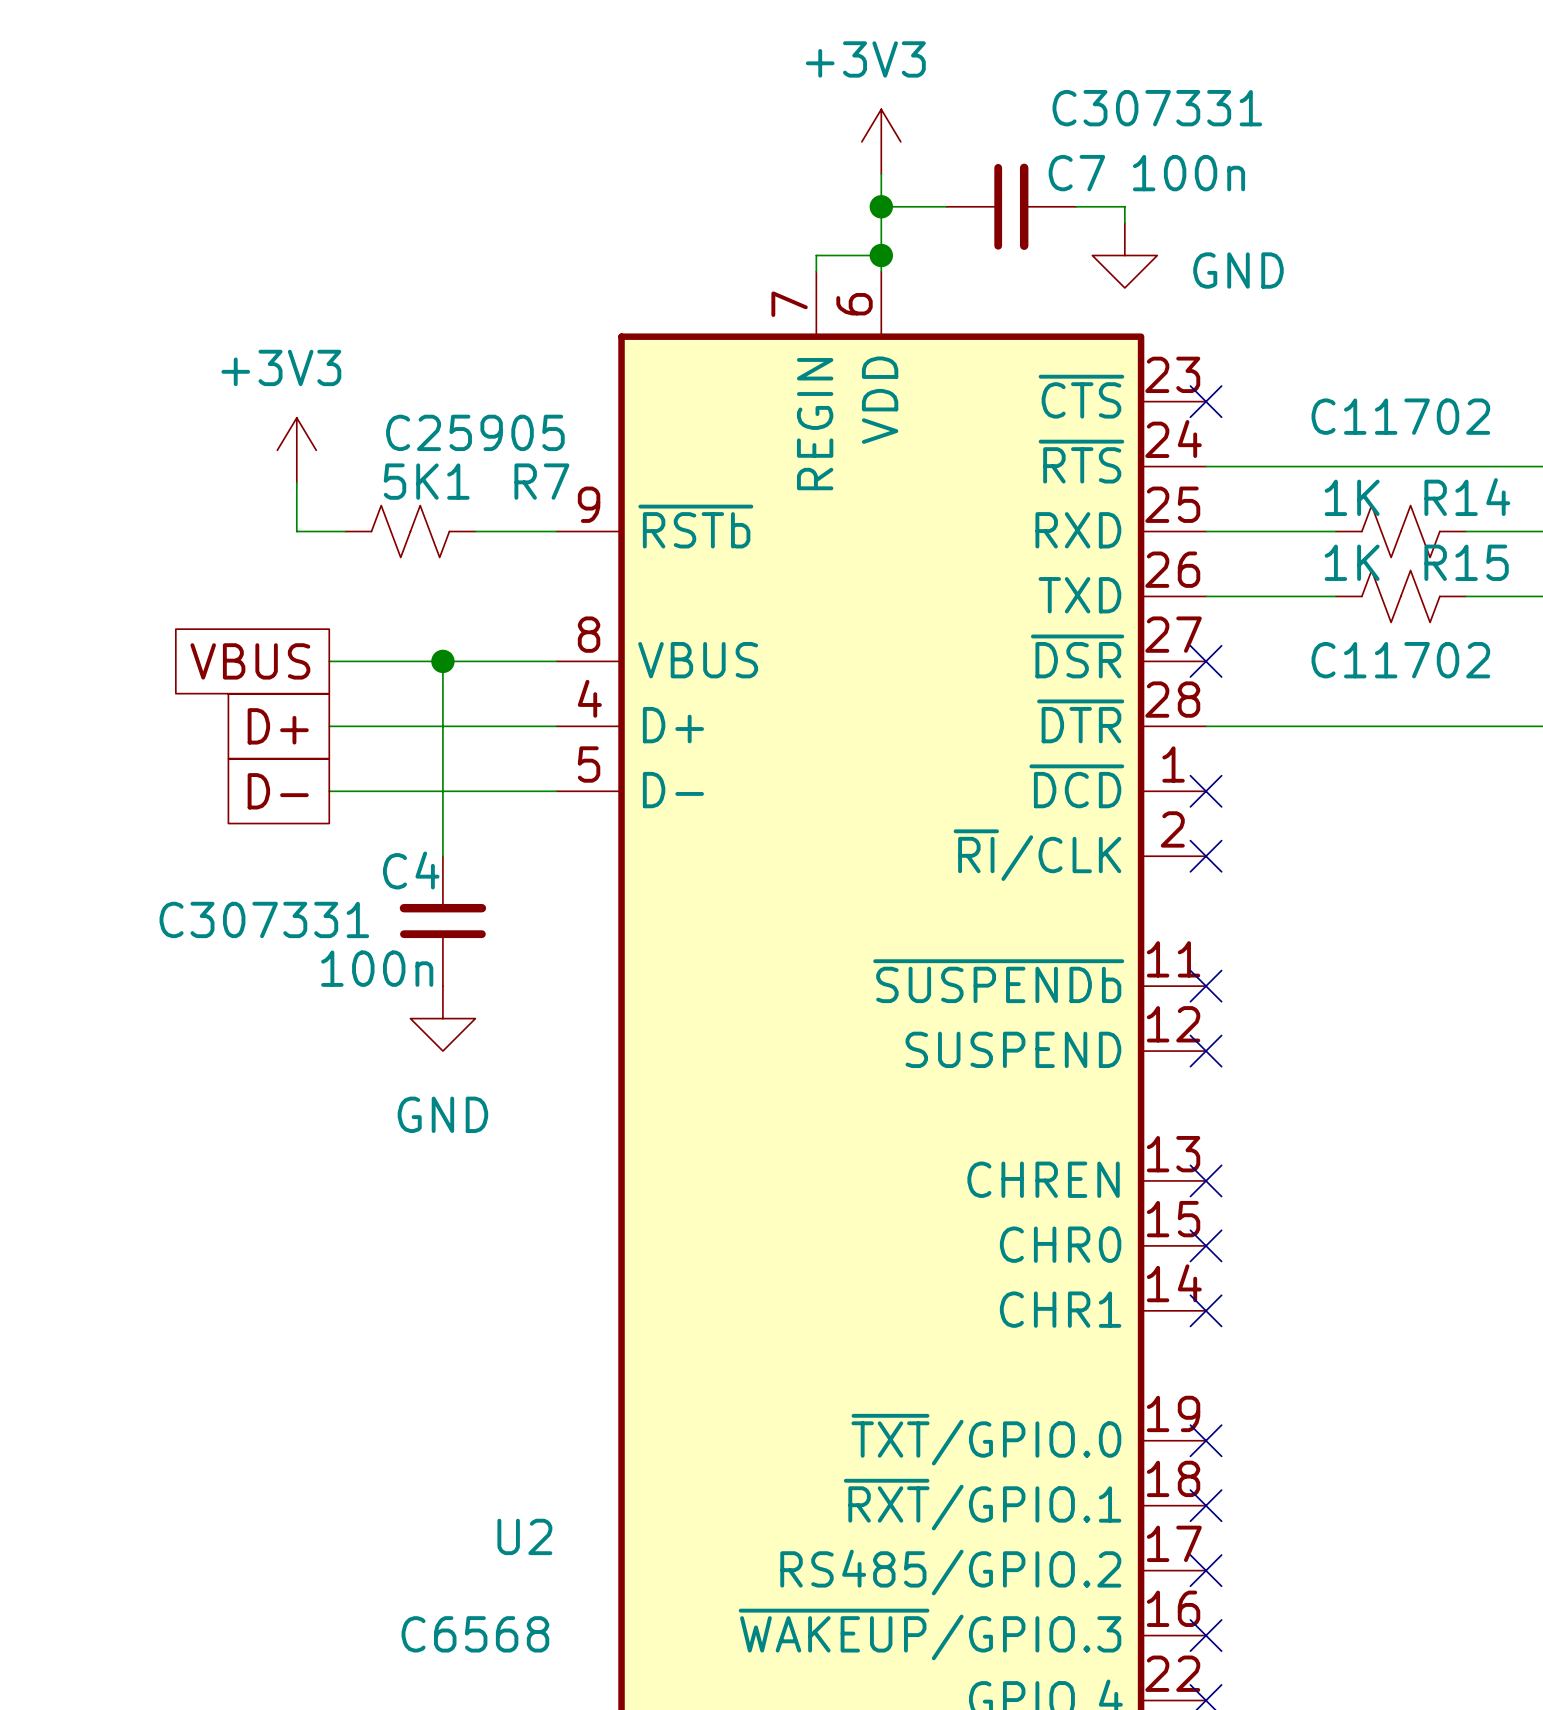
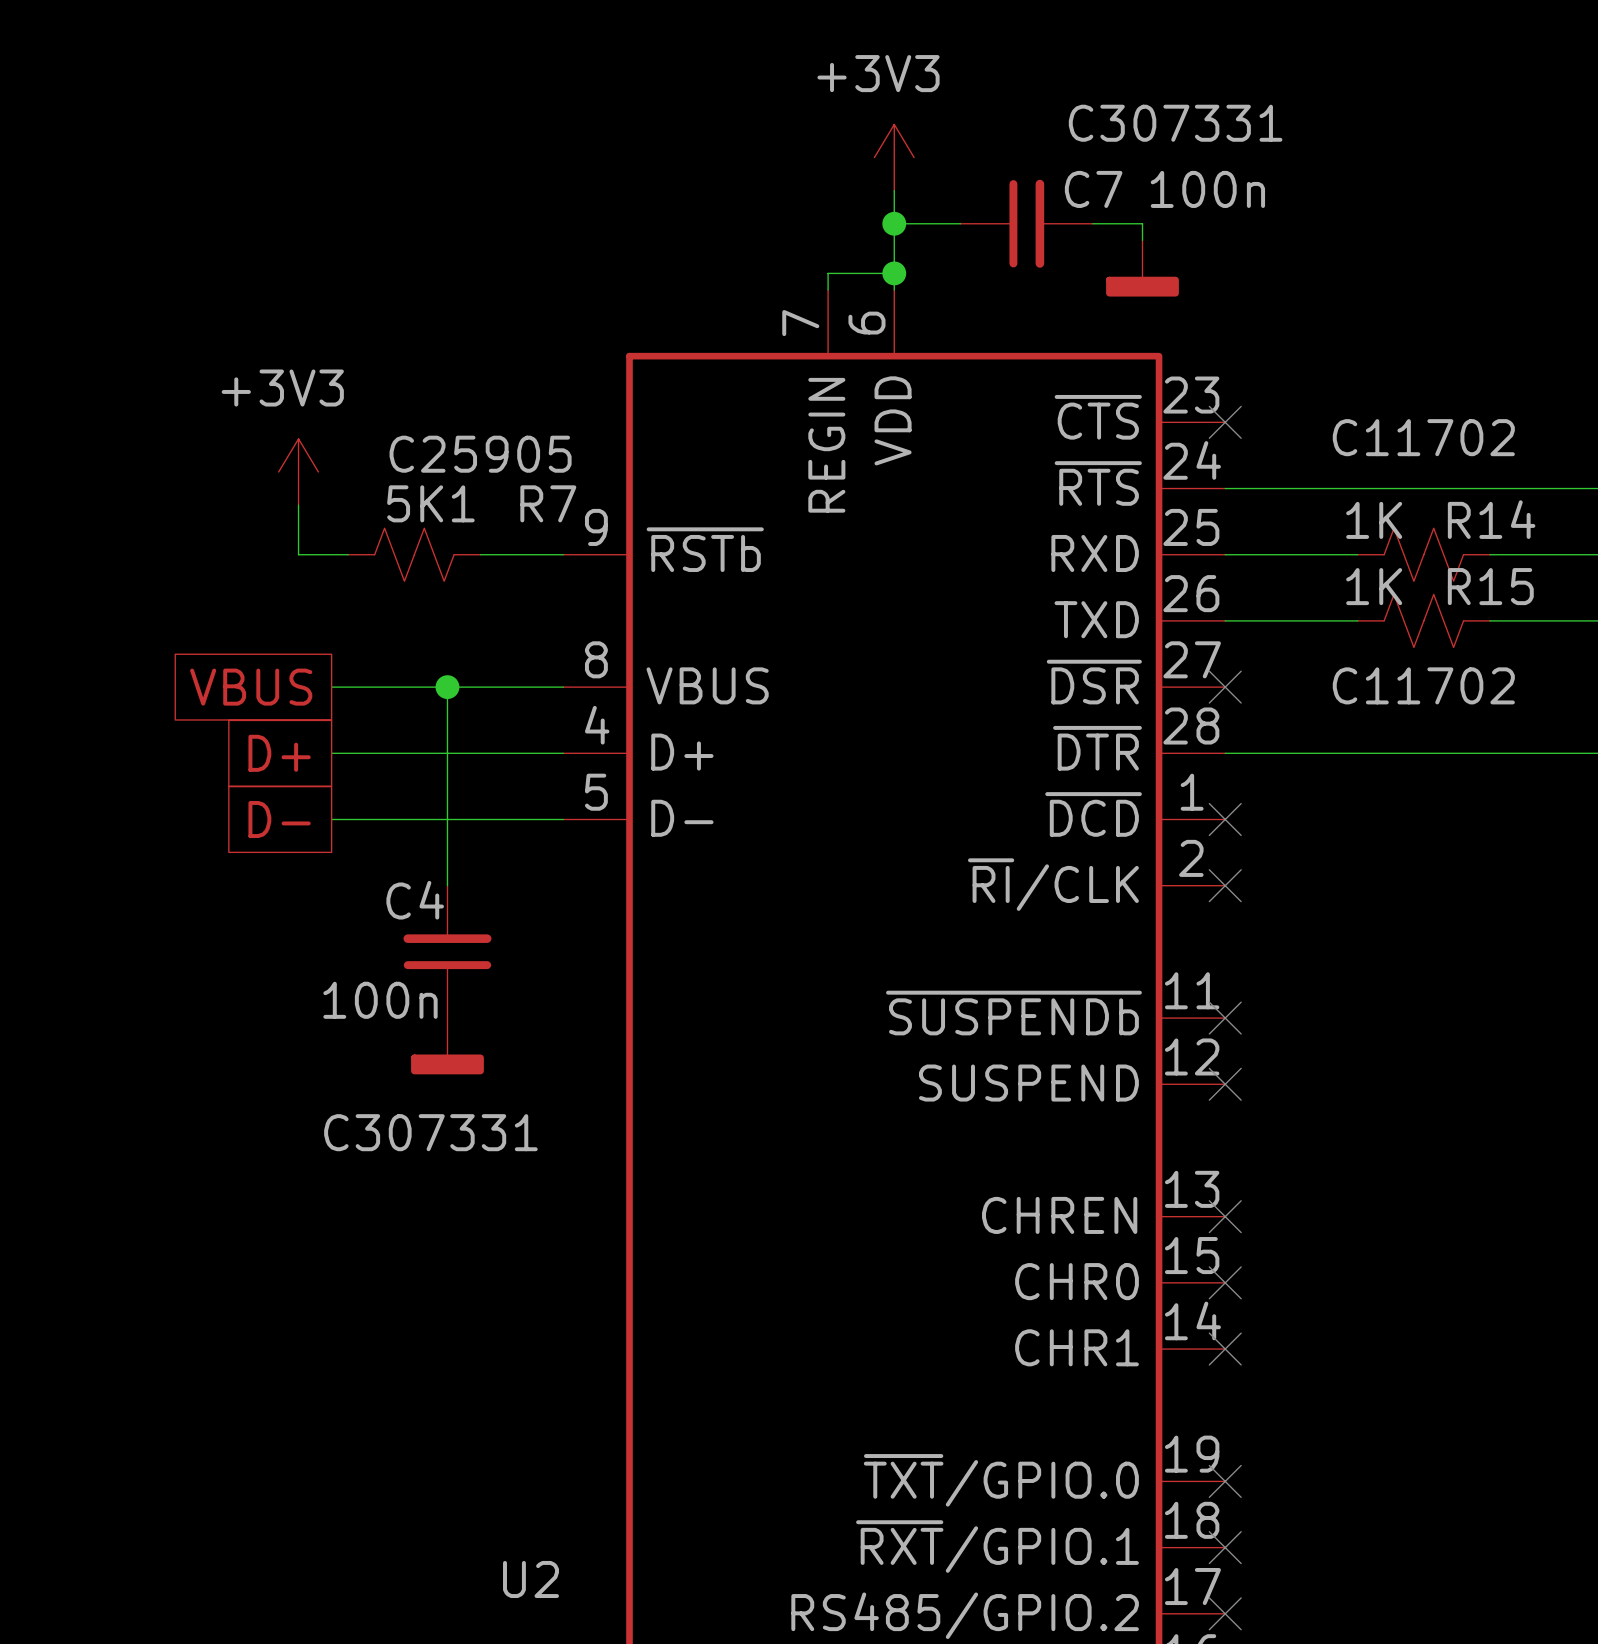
power symbol shape: [1092, 223, 1158, 288] -> [1106, 240, 1179, 297]
power symbol text: GND (1238, 270) -> none
C4 text position: C307331 (264, 919) -> C307331 (430, 1132)
power symbol shape: [410, 986, 476, 1052] -> [411, 1018, 484, 1075]
power symbol text: GND (442, 1114) -> none

